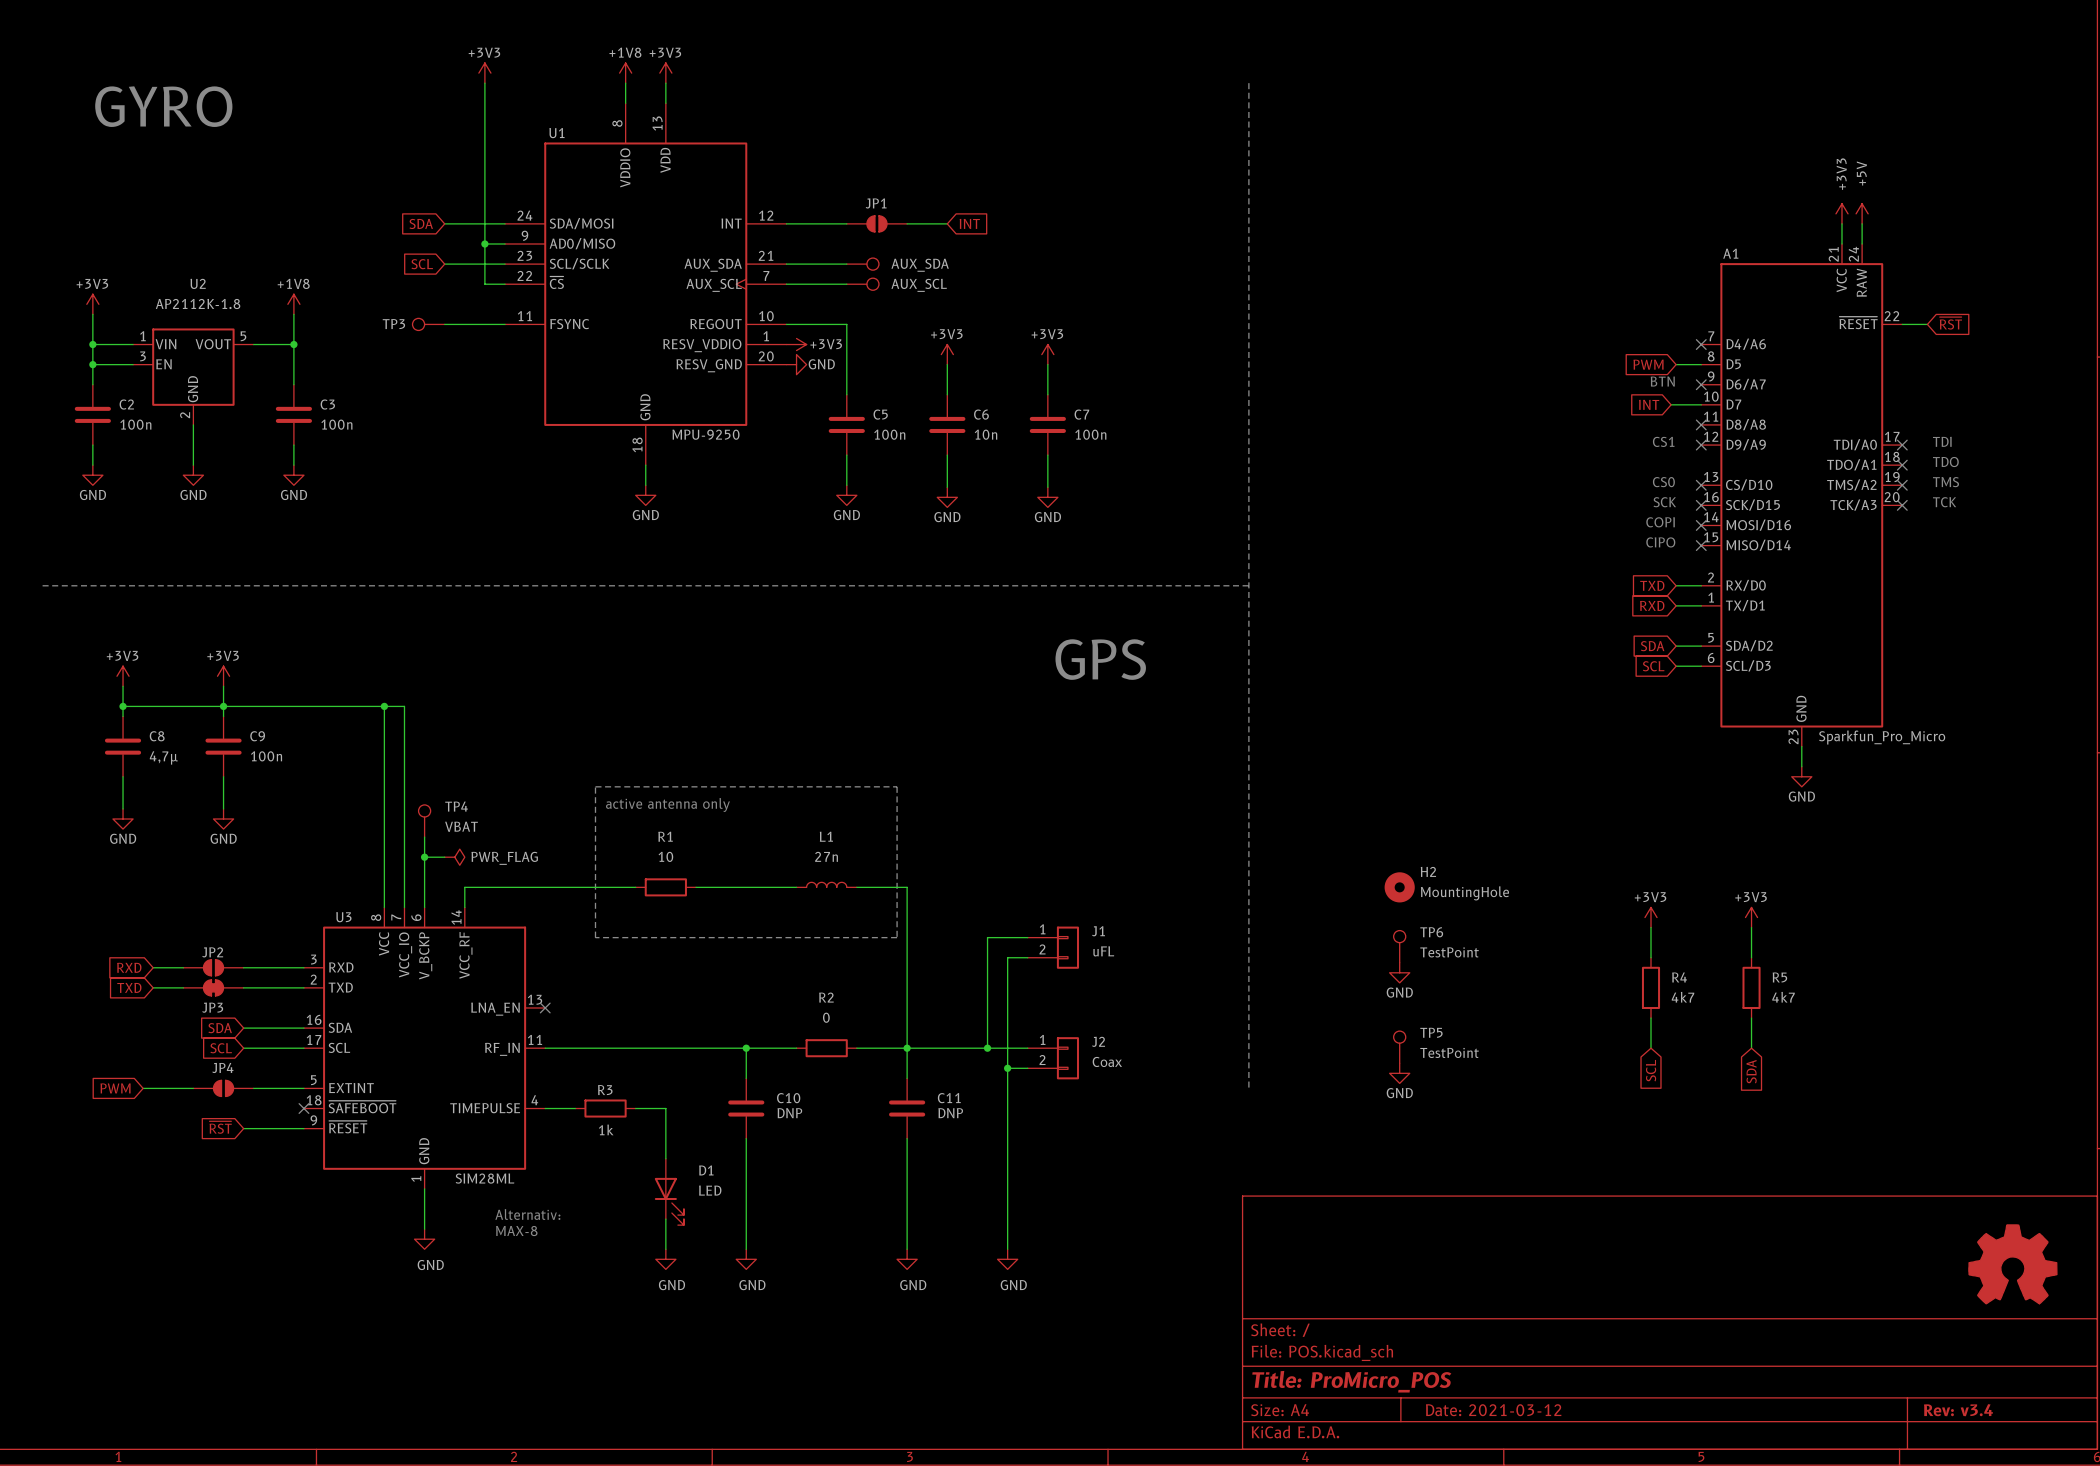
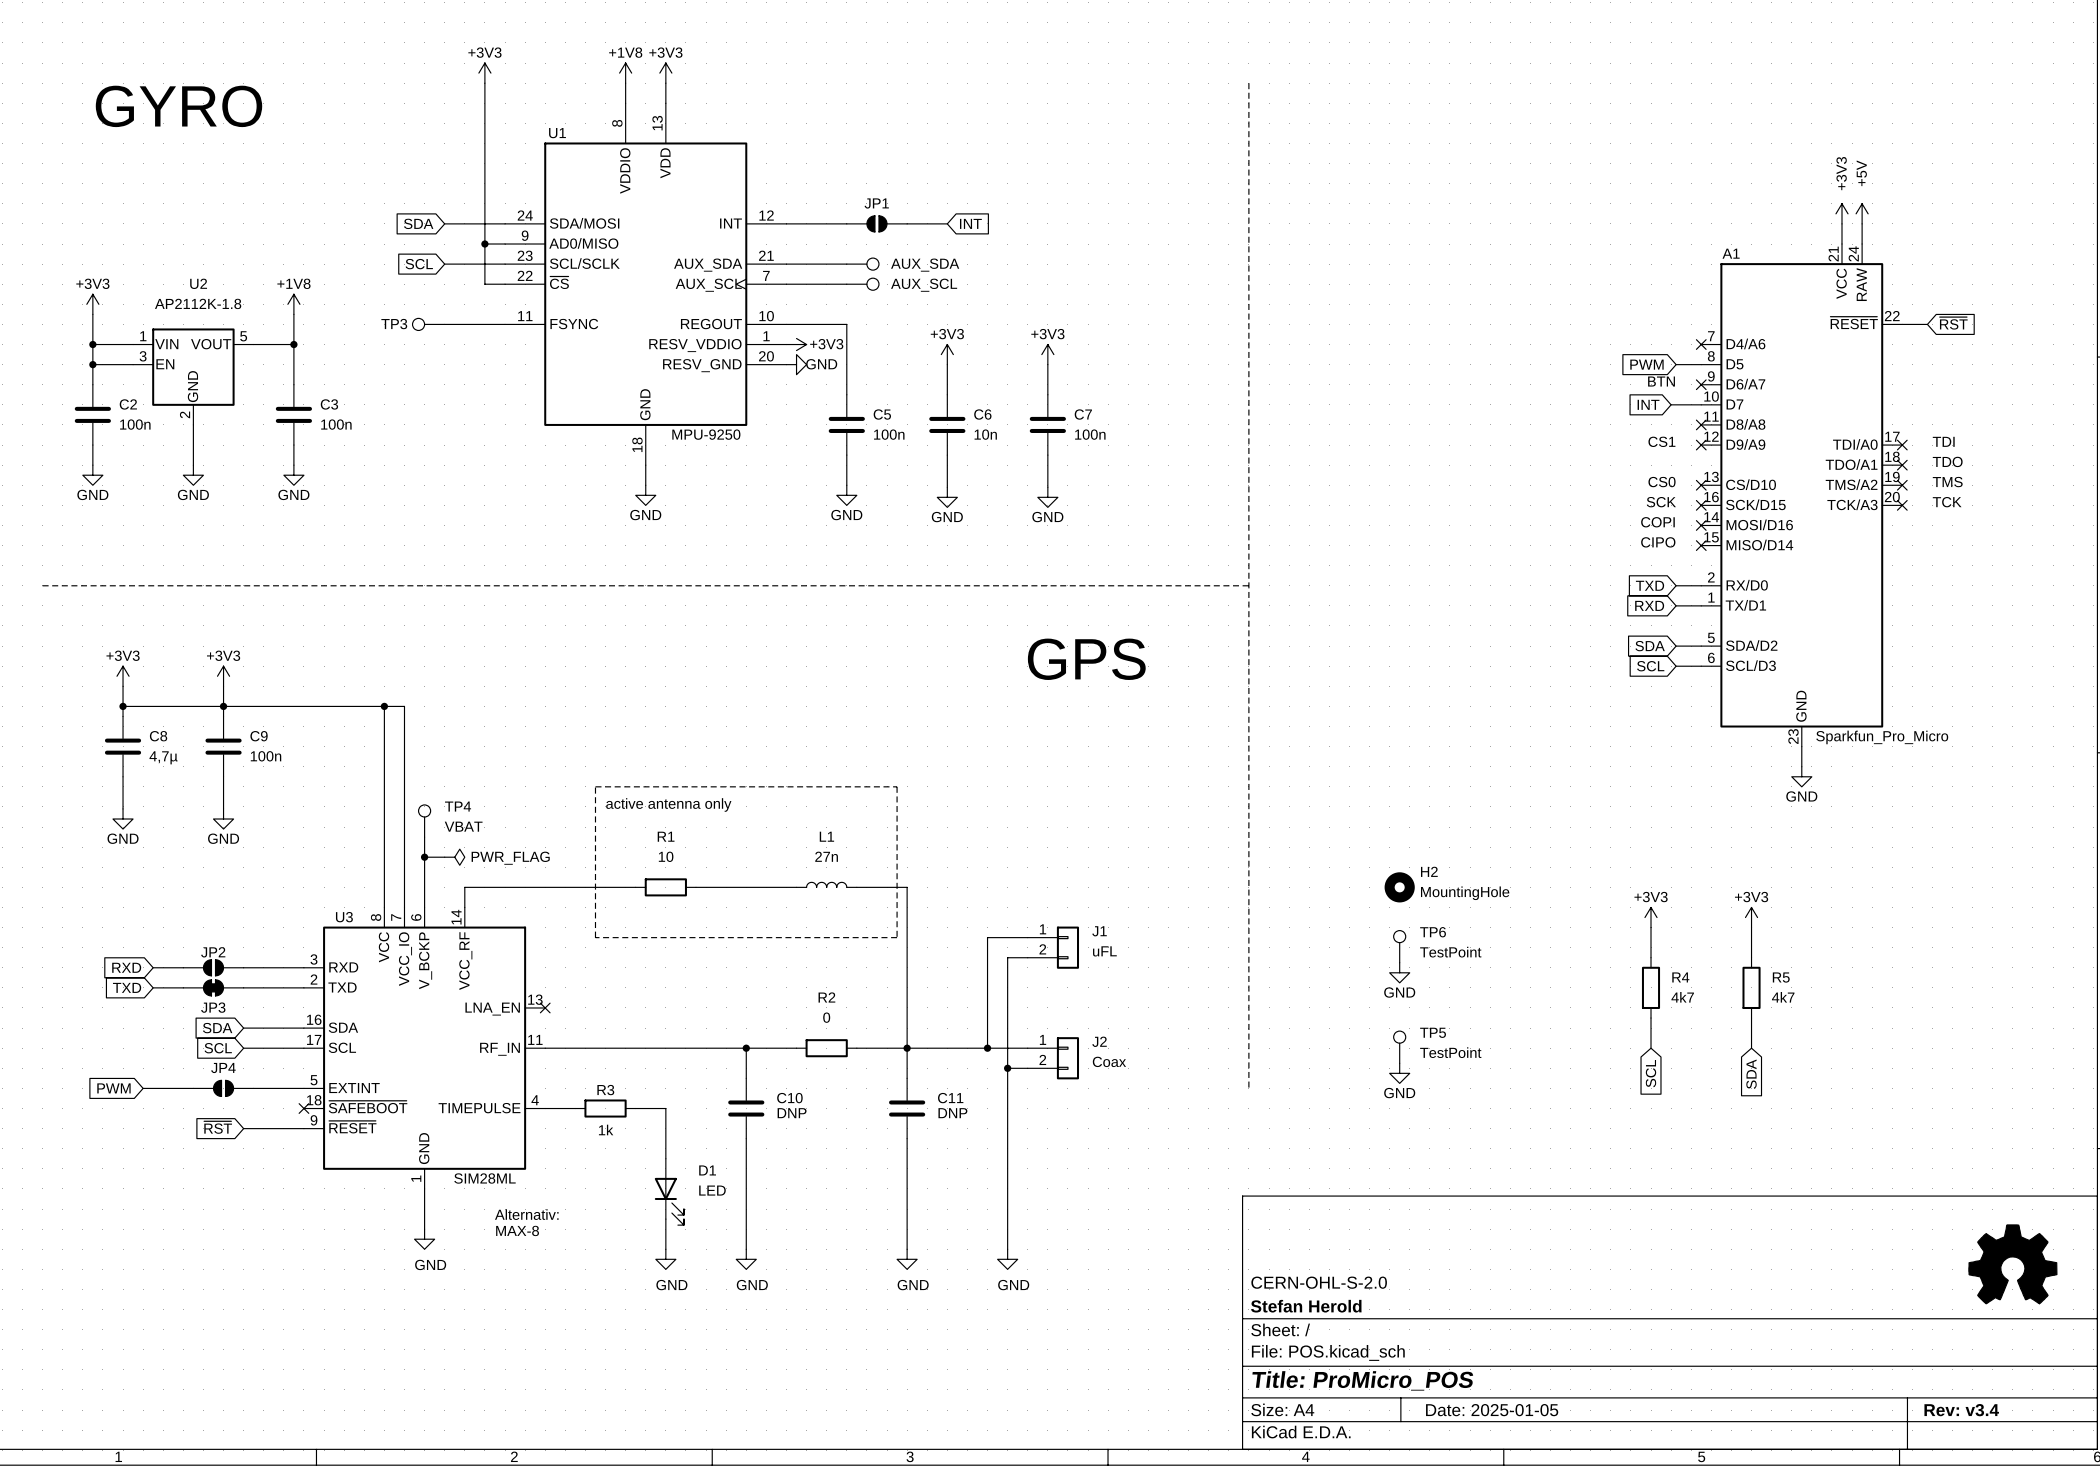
title block: none -> CERN-OHL-S-2.0 (1319, 1282)
title block: none -> Stefan Herold (1306, 1306)
title block: Date: 2021-03-12 (1493, 1410) -> Date: 2025-01-05 (1492, 1410)

